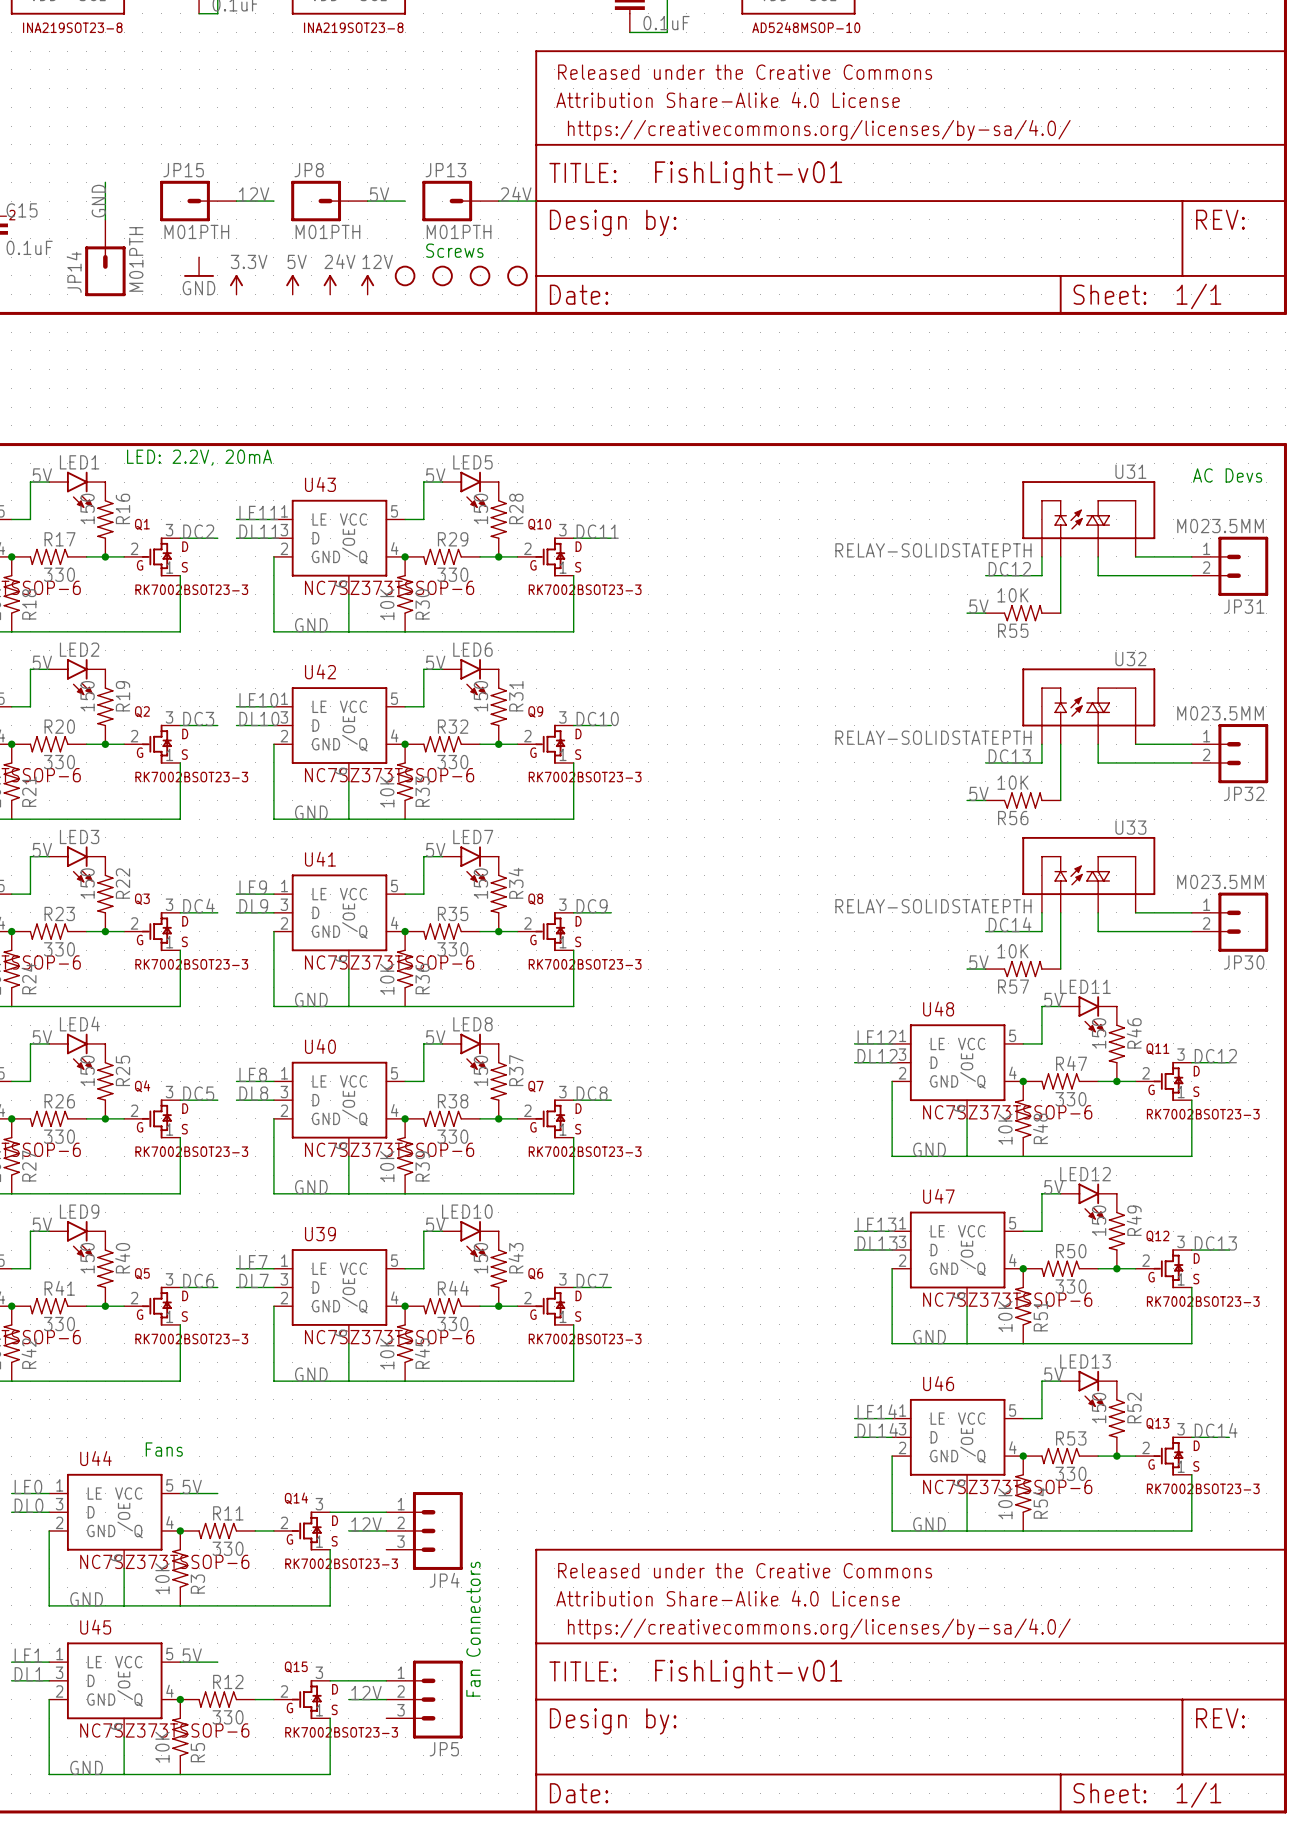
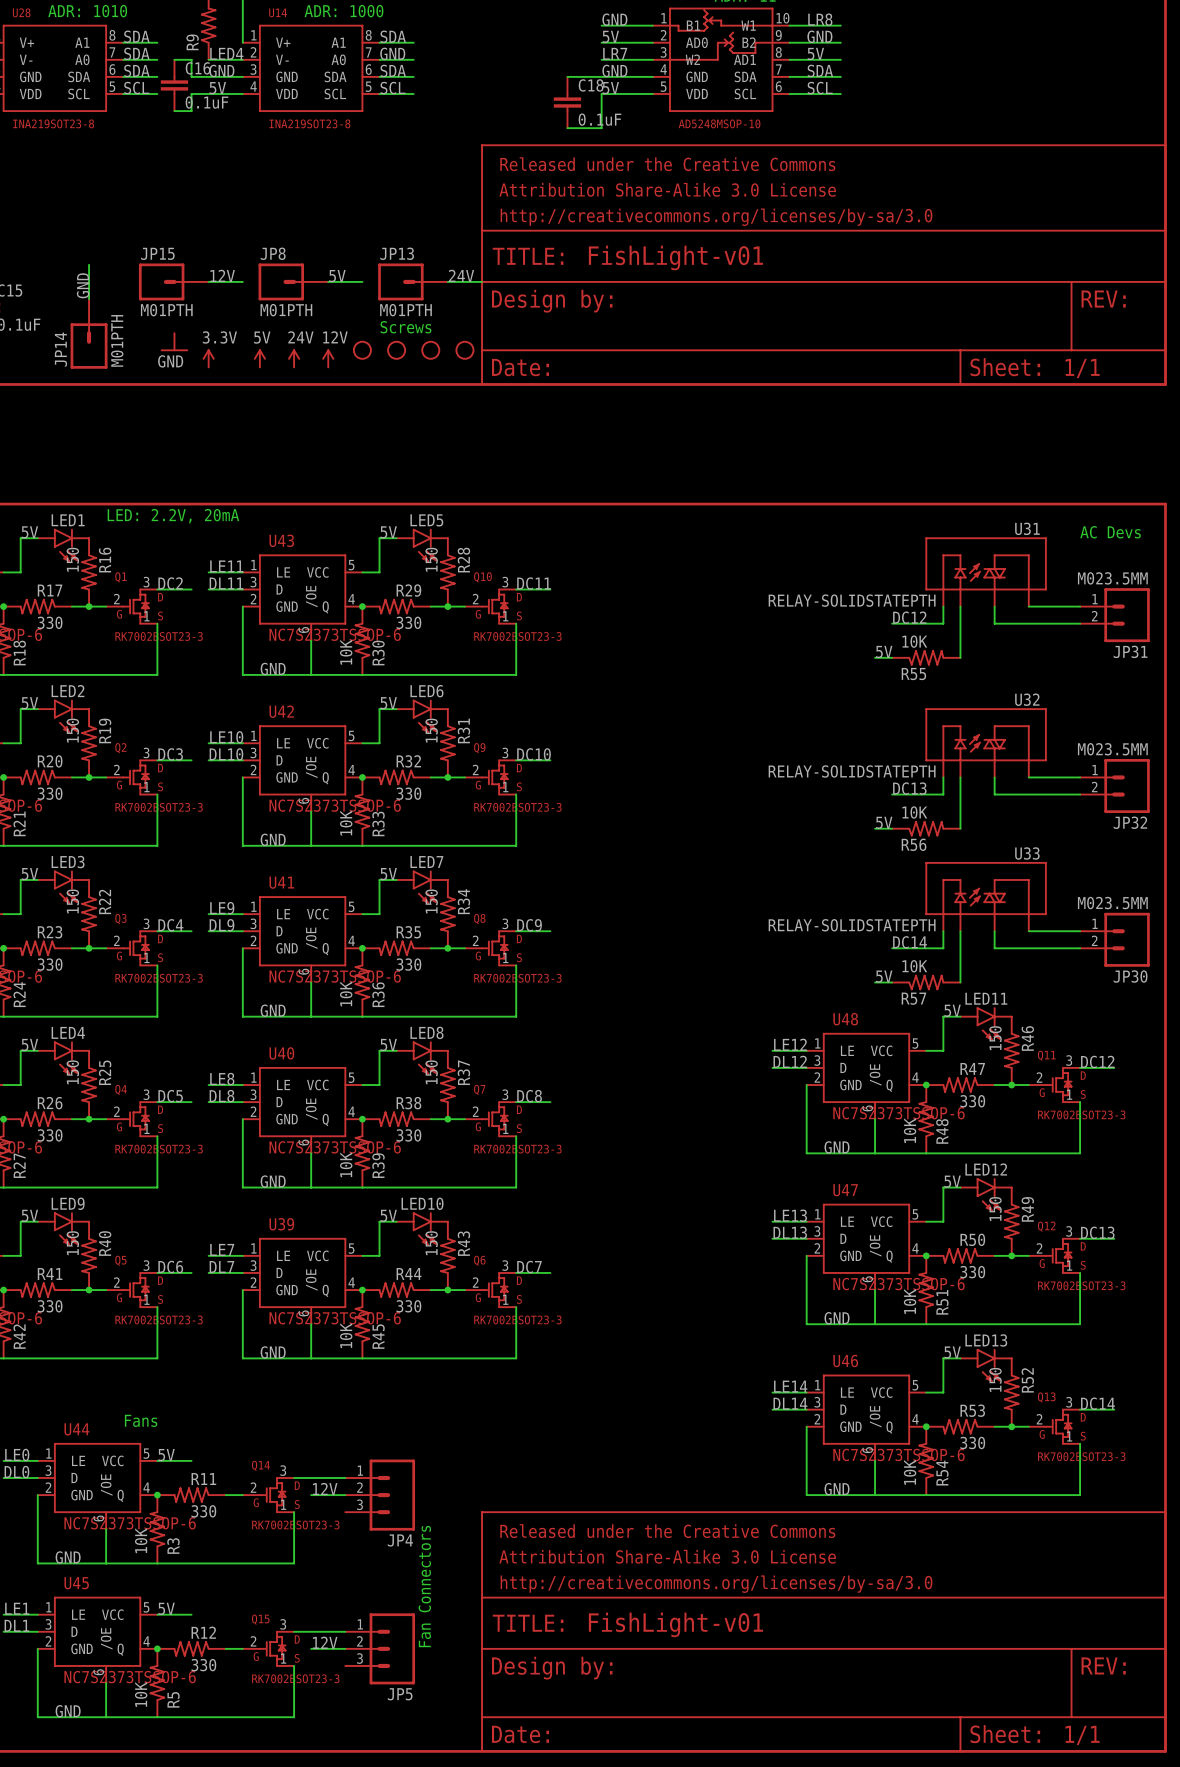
part text: Attribution Share-Alike 4.0 License (728, 99) -> Attribution Share-Alike 3.0 License (667, 189)
part text: https://creativecommons.org/licenses/by-sa/4.0/ (819, 130) -> http://creativecommons.org/licenses/by-sa/3.0 (716, 217)
part text: Attribution Share-Alike 4.0 License (728, 1598) -> Attribution Share-Alike 3.0 License (667, 1556)
part text: https://creativecommons.org/licenses/by-sa/4.0/ (819, 1628) -> http://creativecommons.org/licenses/by-sa/3.0 (716, 1584)

